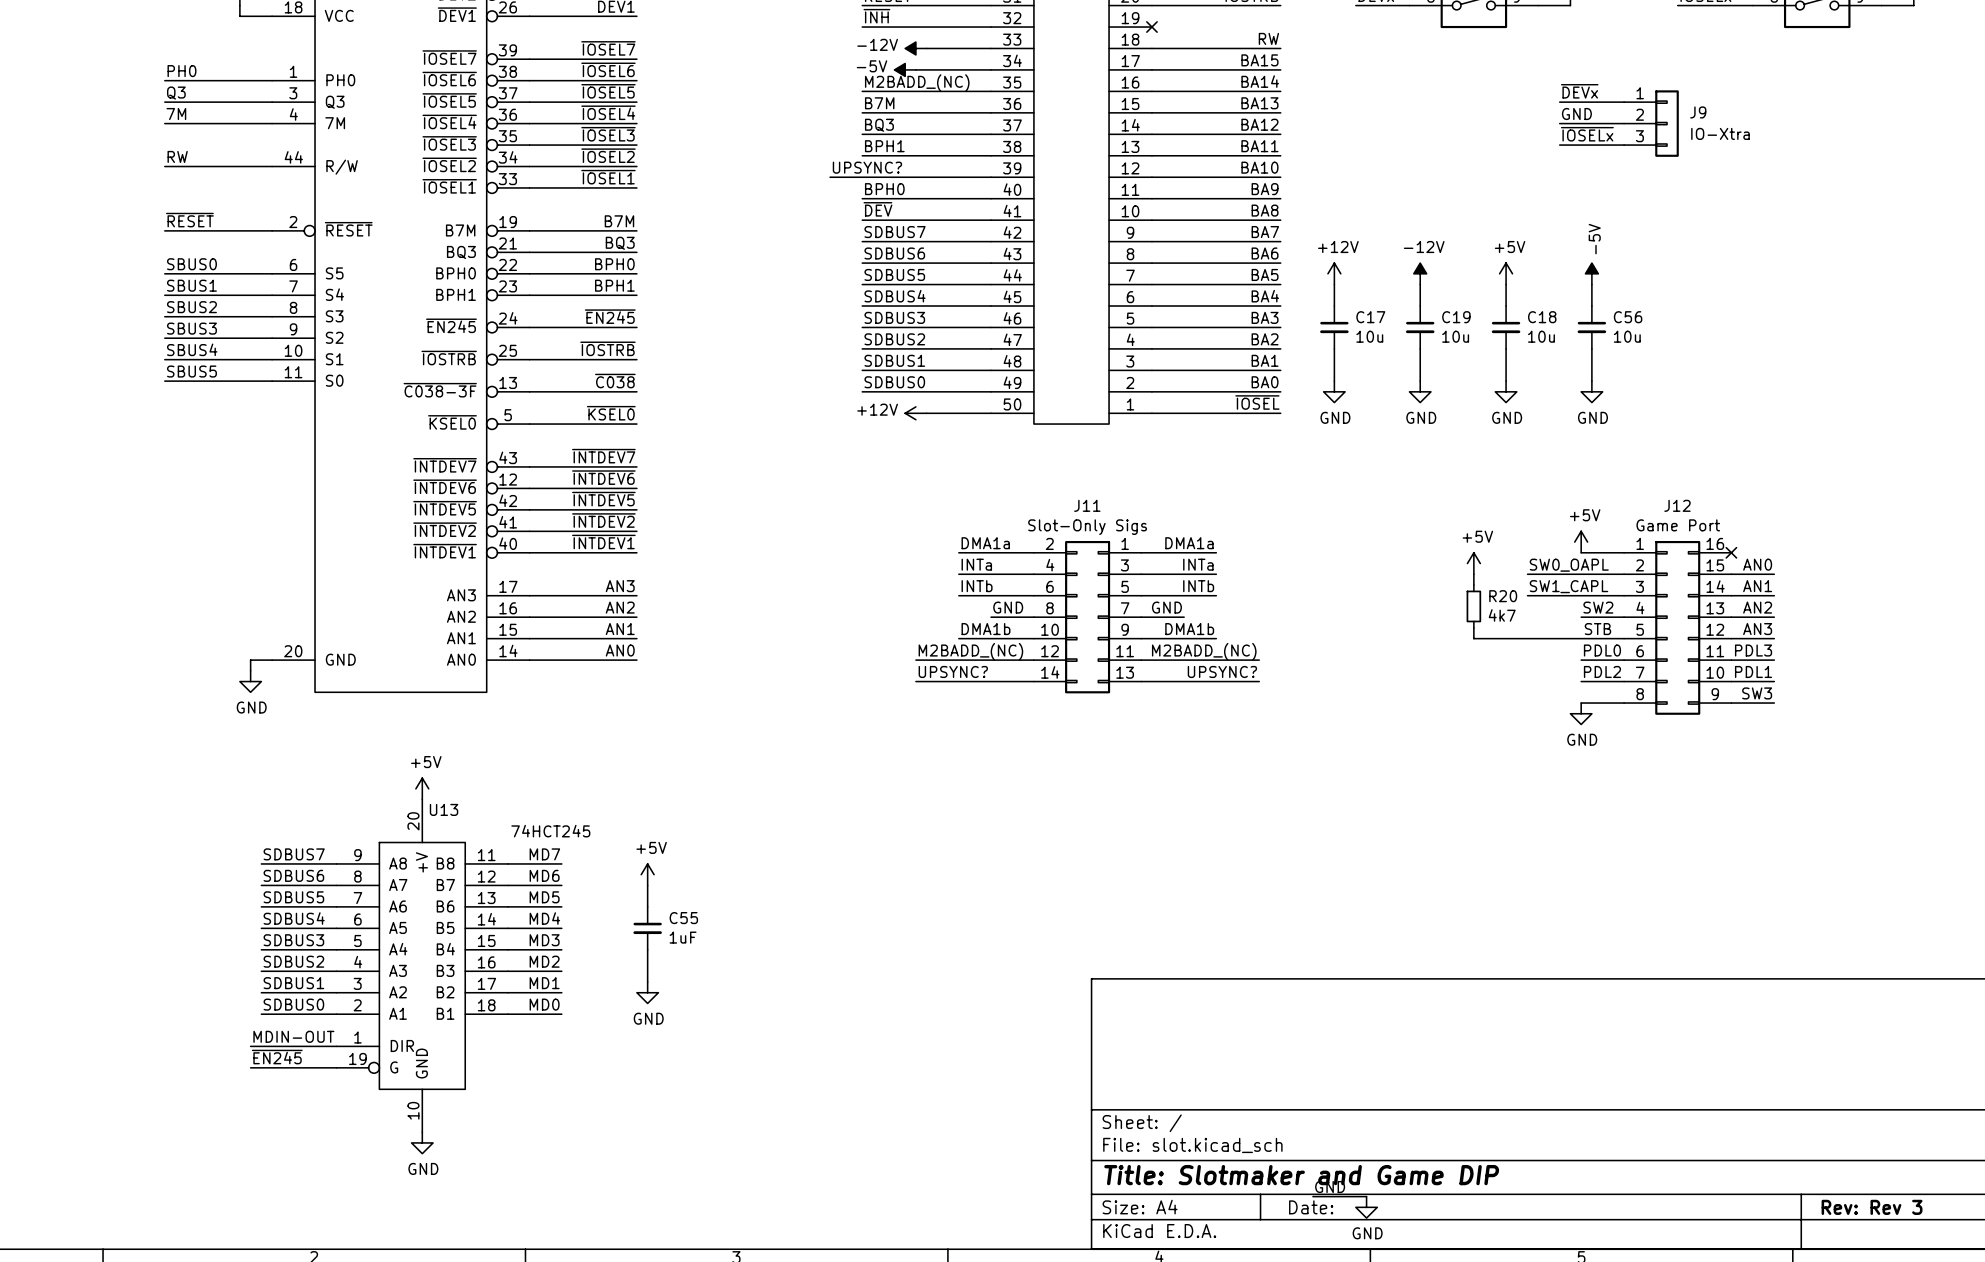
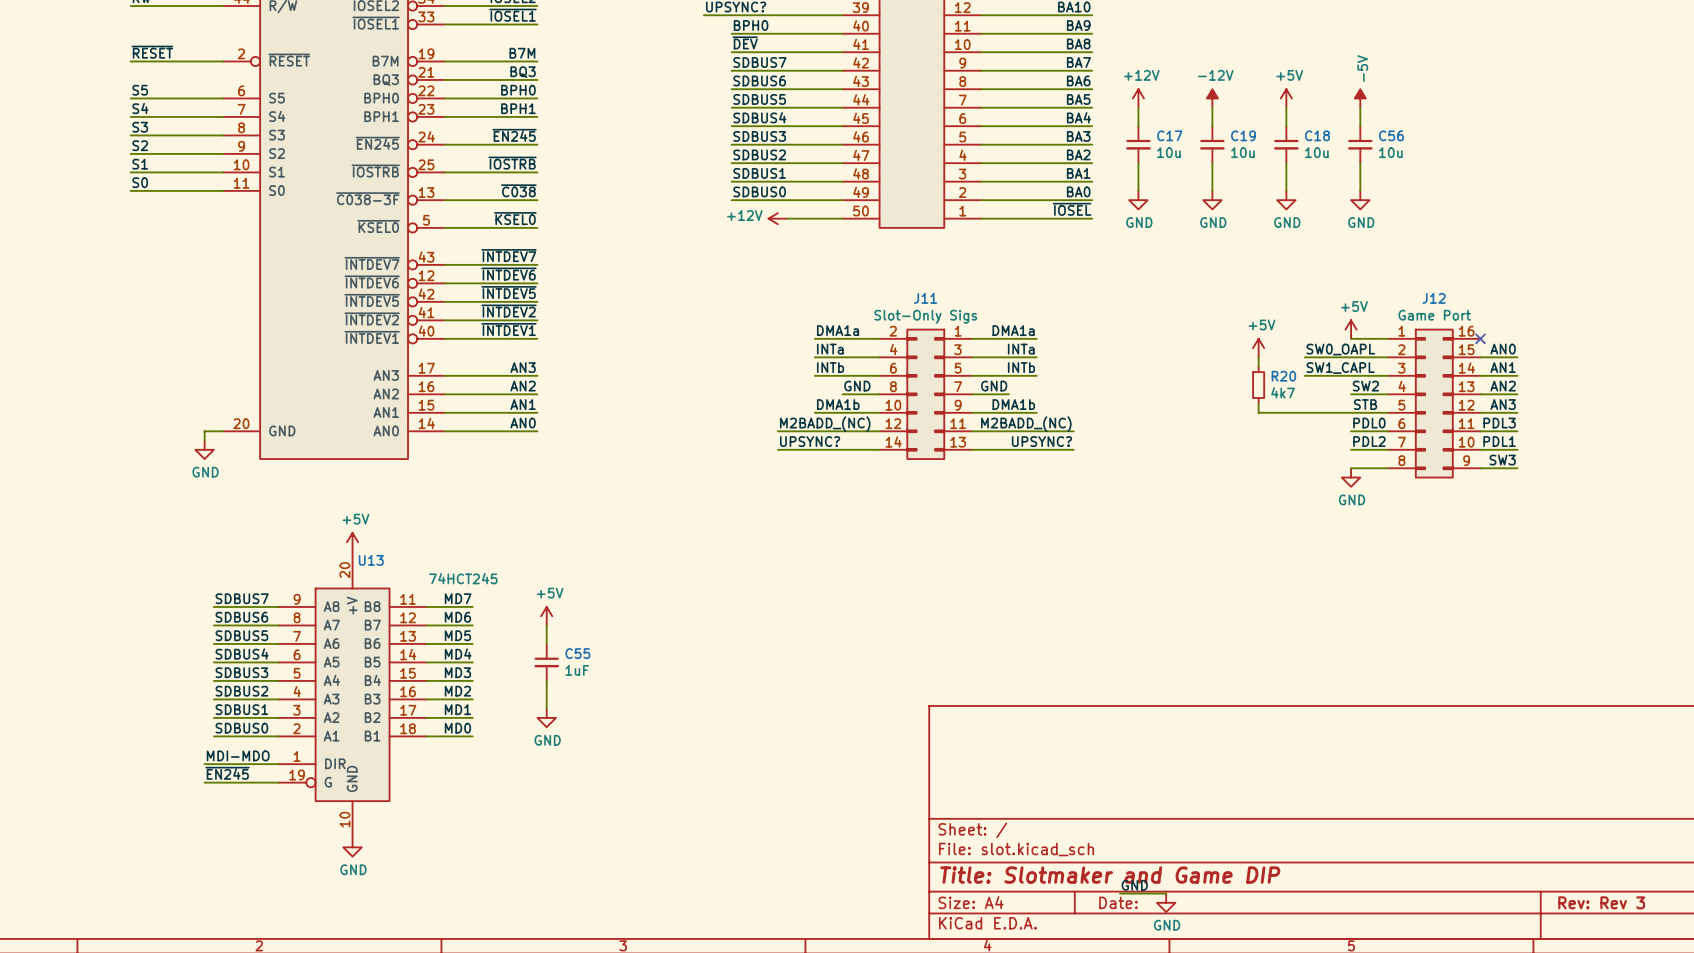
label: SBUS0 (191, 264) -> S5 (140, 90)
label: SBUS1 (191, 285) -> S4 (140, 108)
label: SBUS2 (191, 307) -> S3 (140, 127)
label: SBUS3 (191, 328) -> S2 (140, 145)
label: SBUS4 (192, 349) -> S1 (140, 164)
label: SBUS5 (191, 371) -> S0 (140, 182)
label: MDIN-OUT (293, 1036) -> MDI-MDO (238, 755)

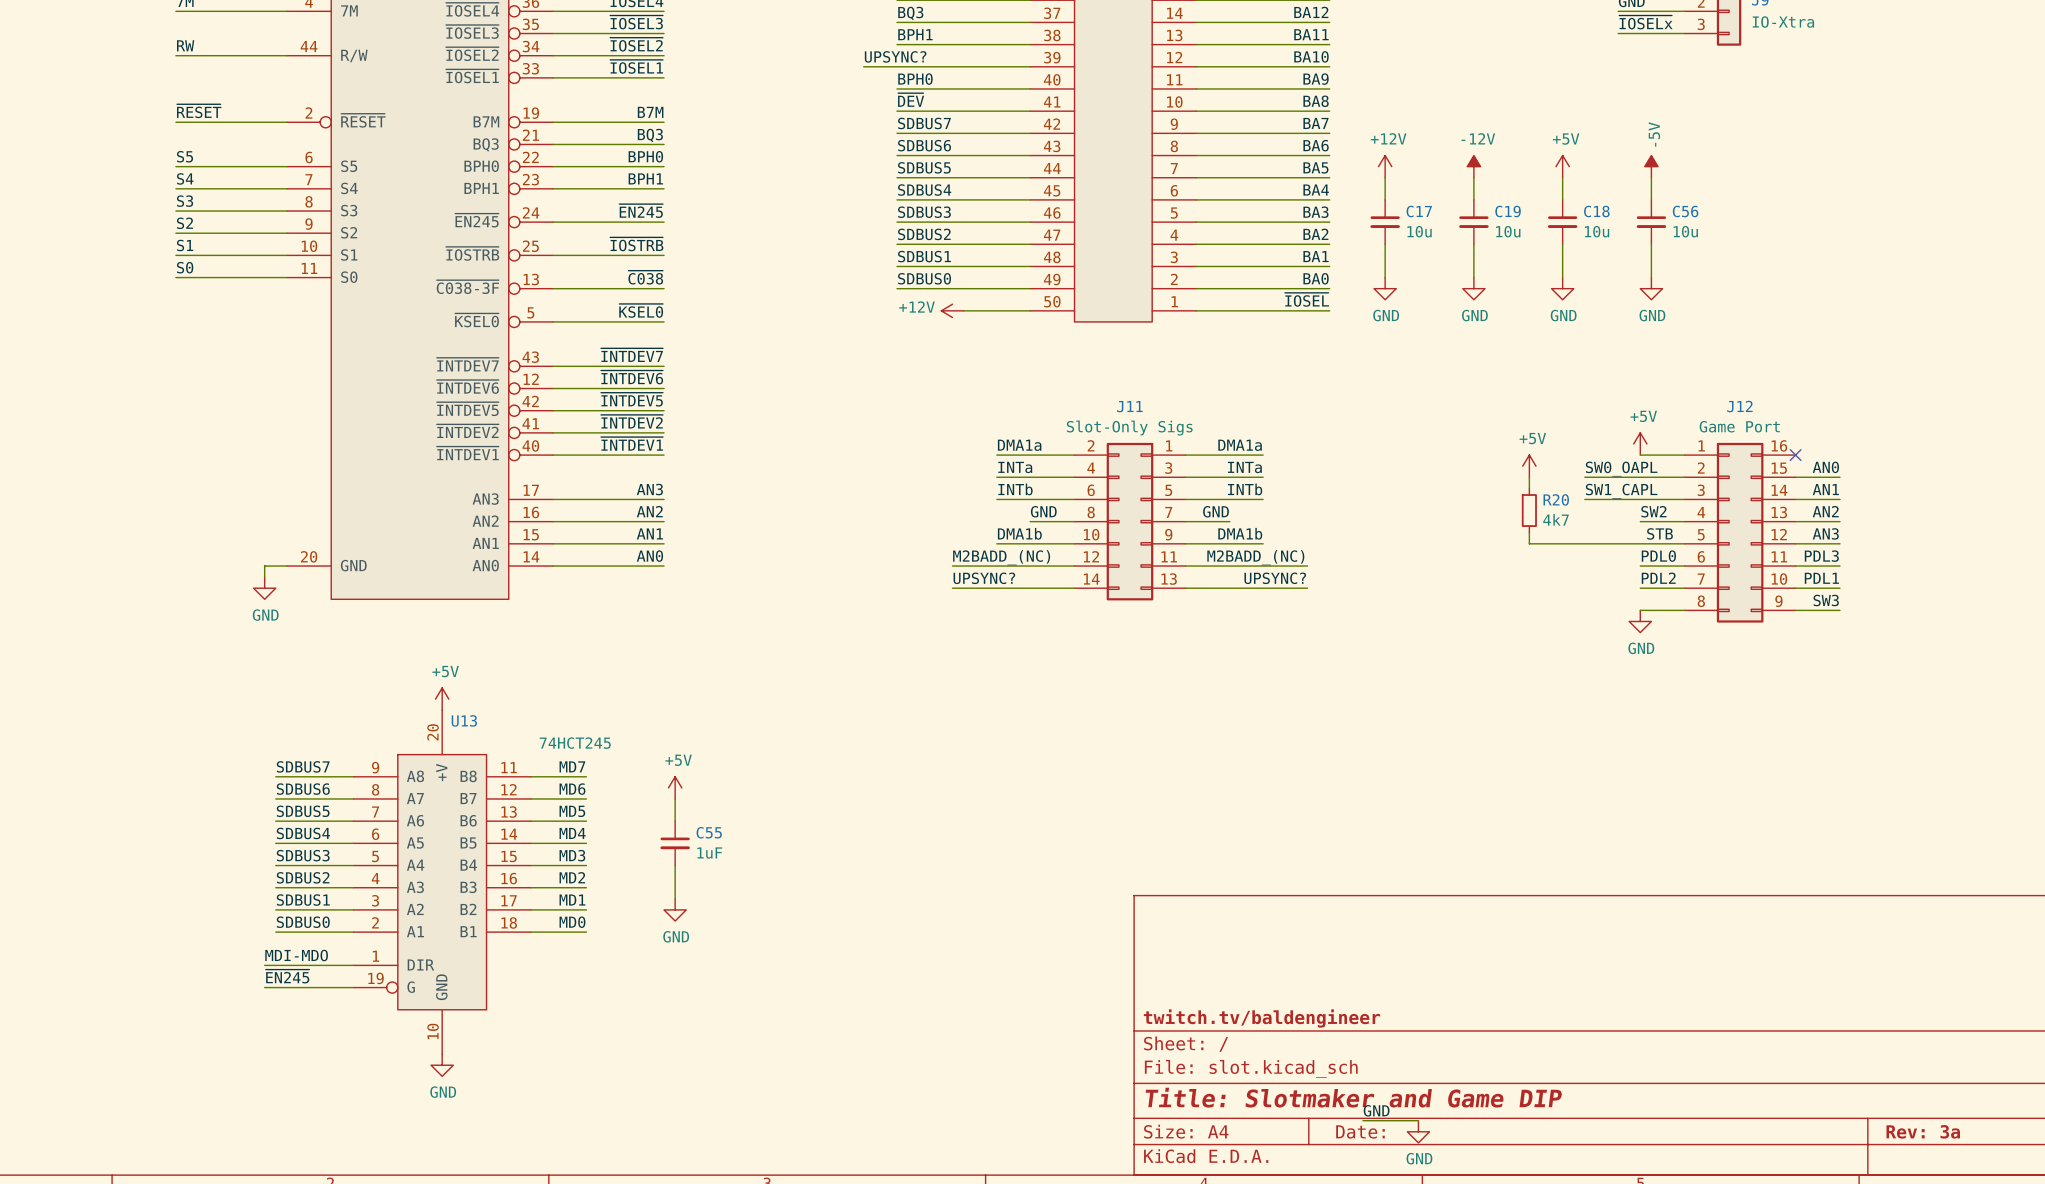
title block: none -> twitch.tv/baldengineer (1261, 1018)
title block: Rev: Rev 3 (1601, 902) -> Rev: 3a (1923, 1131)

